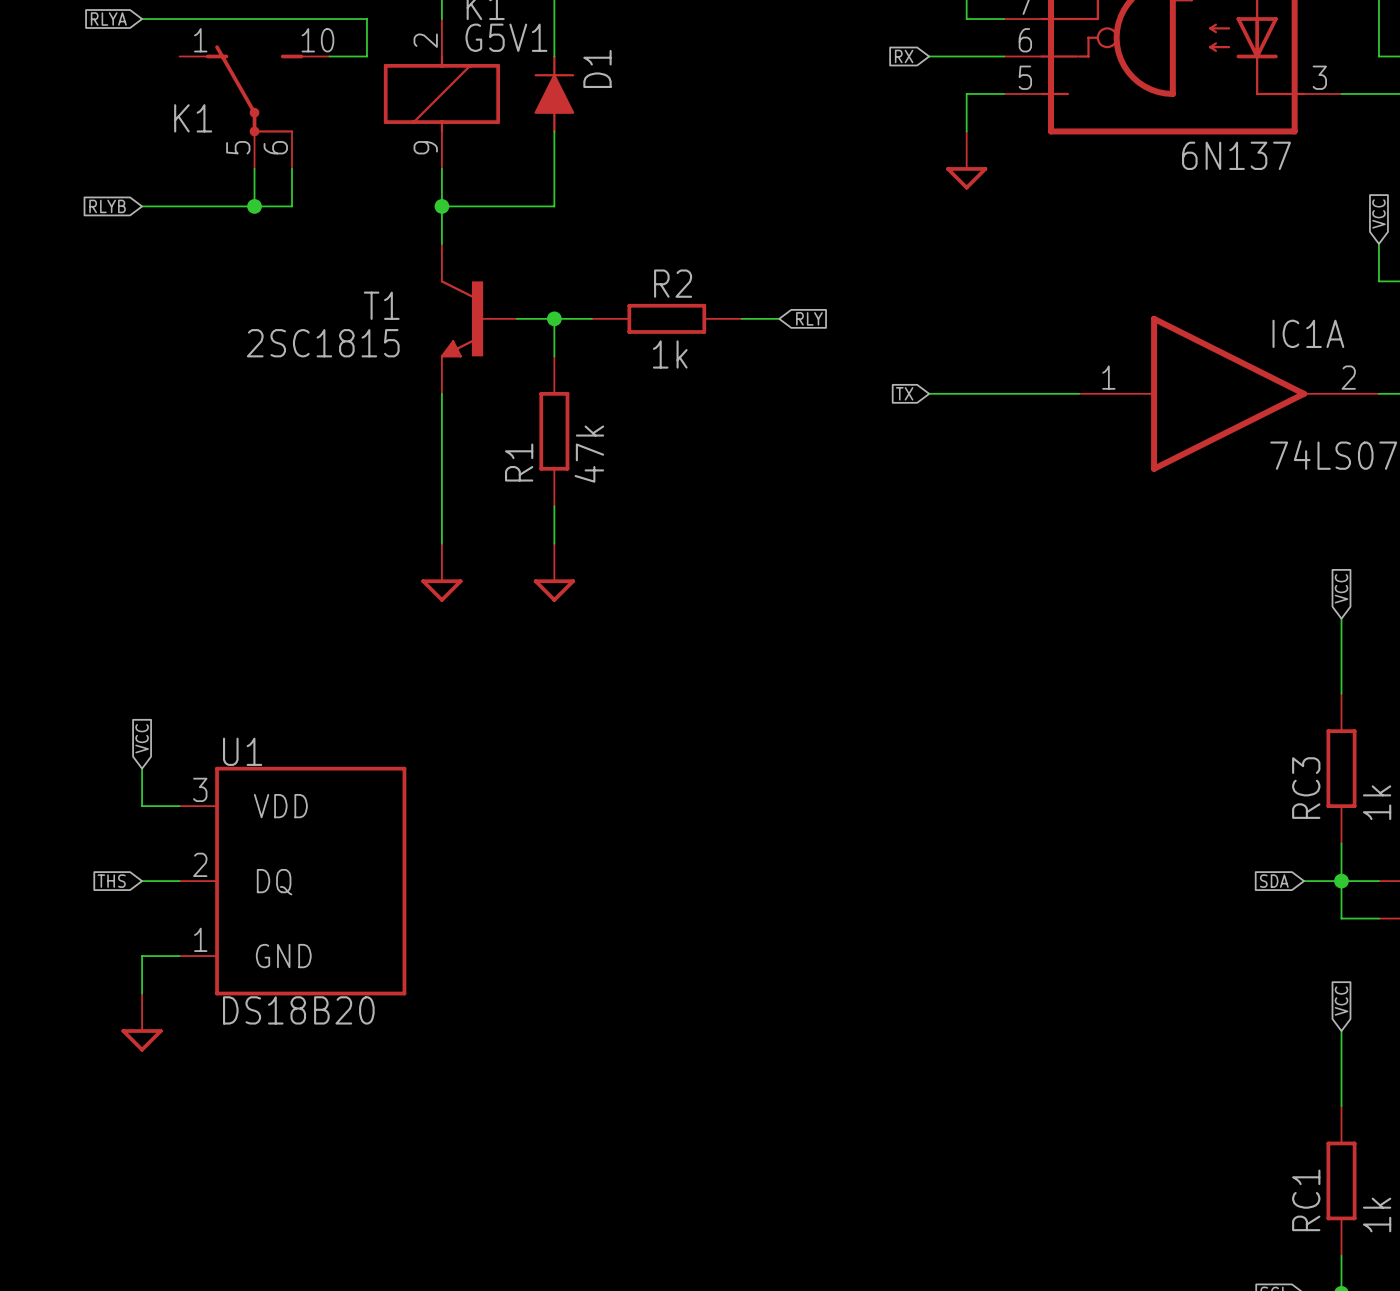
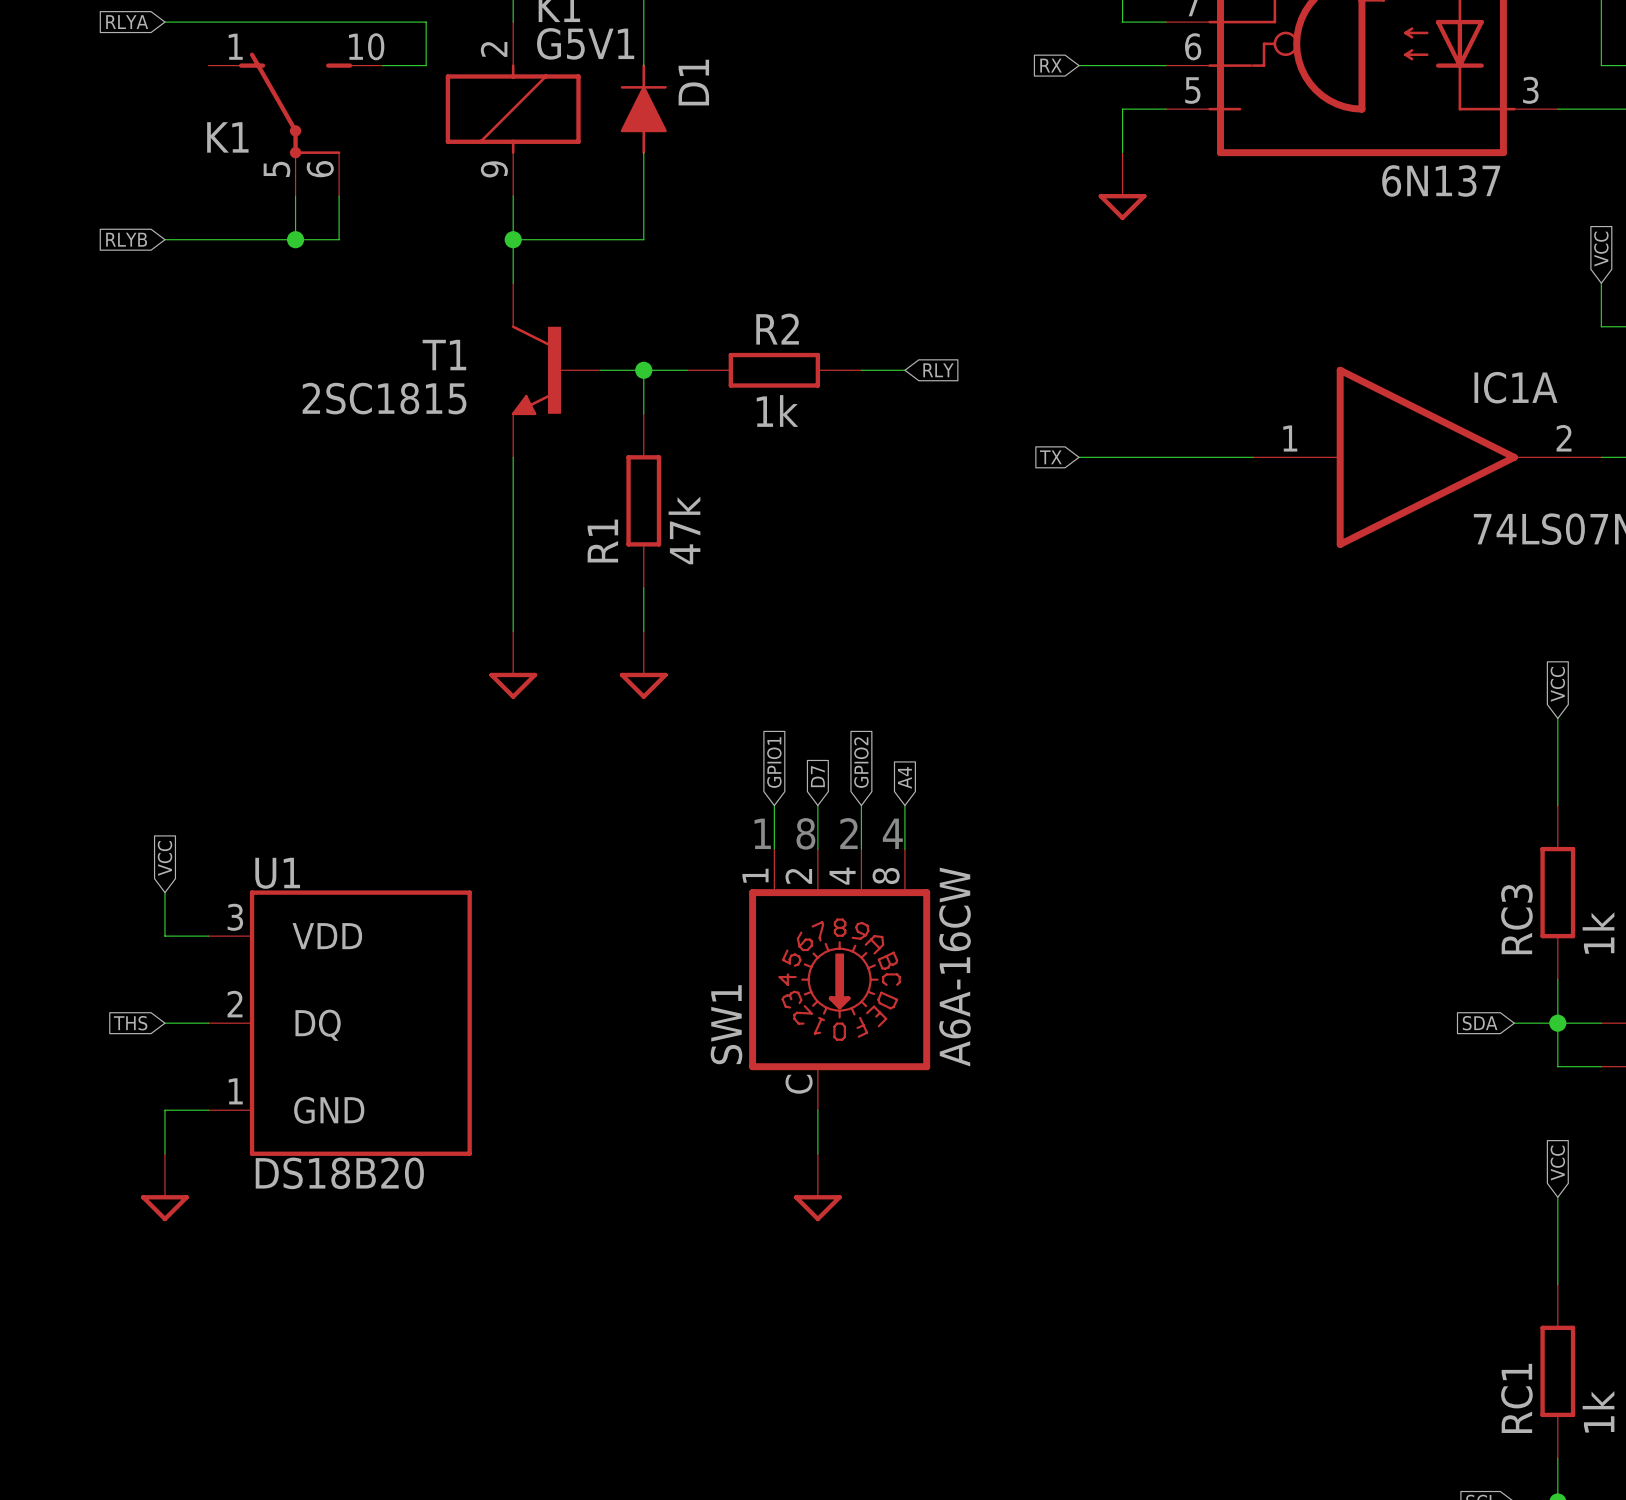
global label: none -> GPIO1 (774, 762)
global label: none -> GPIO2 (861, 762)
global label: none -> D7 (817, 776)
global label: none -> A4 (904, 777)
wire: none -> (774, 805) (774, 849)
wire: none -> (817, 805) (817, 849)
wire: none -> (861, 805) (861, 849)
wire: none -> (904, 805) (904, 849)
text: none -> 4 (892, 833)
text: none -> 1 (762, 833)
text: none -> 8 (805, 833)
text: none -> 2 (848, 833)
SW1: none -> A6A-16CW (839, 979)
wire: none -> (817, 1110) (817, 1153)
power symbol: none -> (817, 1187)

